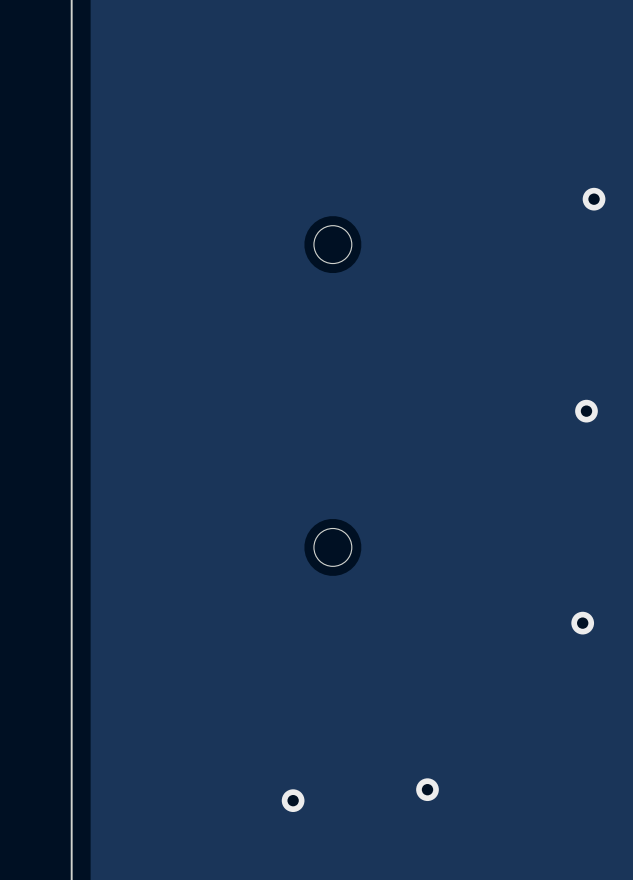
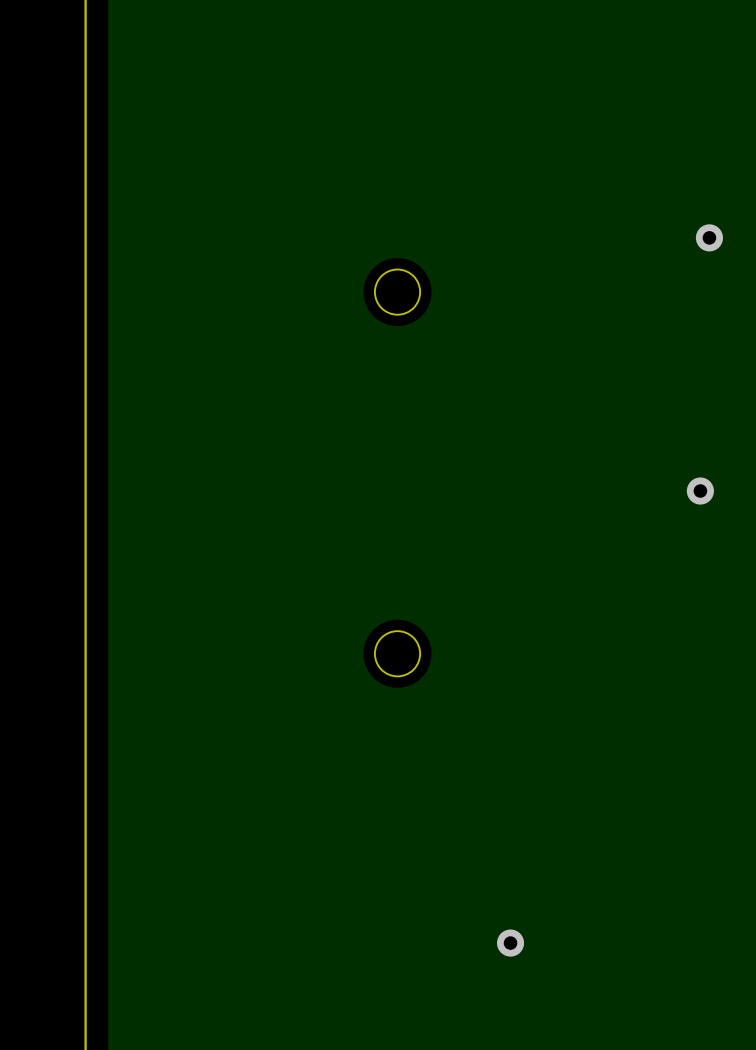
via: (582, 623) -> none
via: (293, 800) -> none

